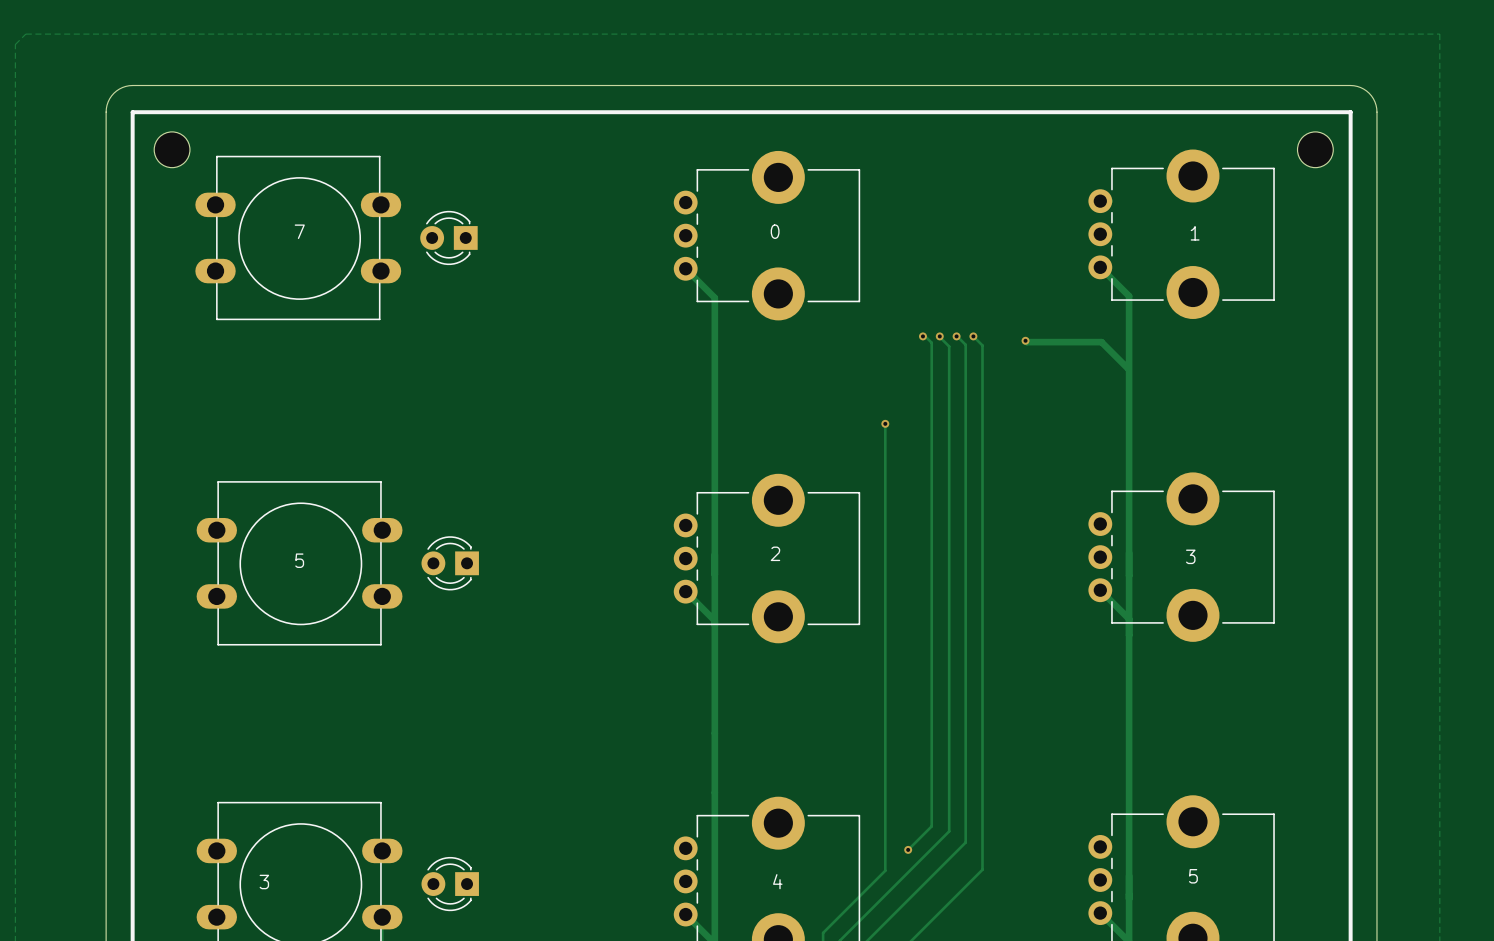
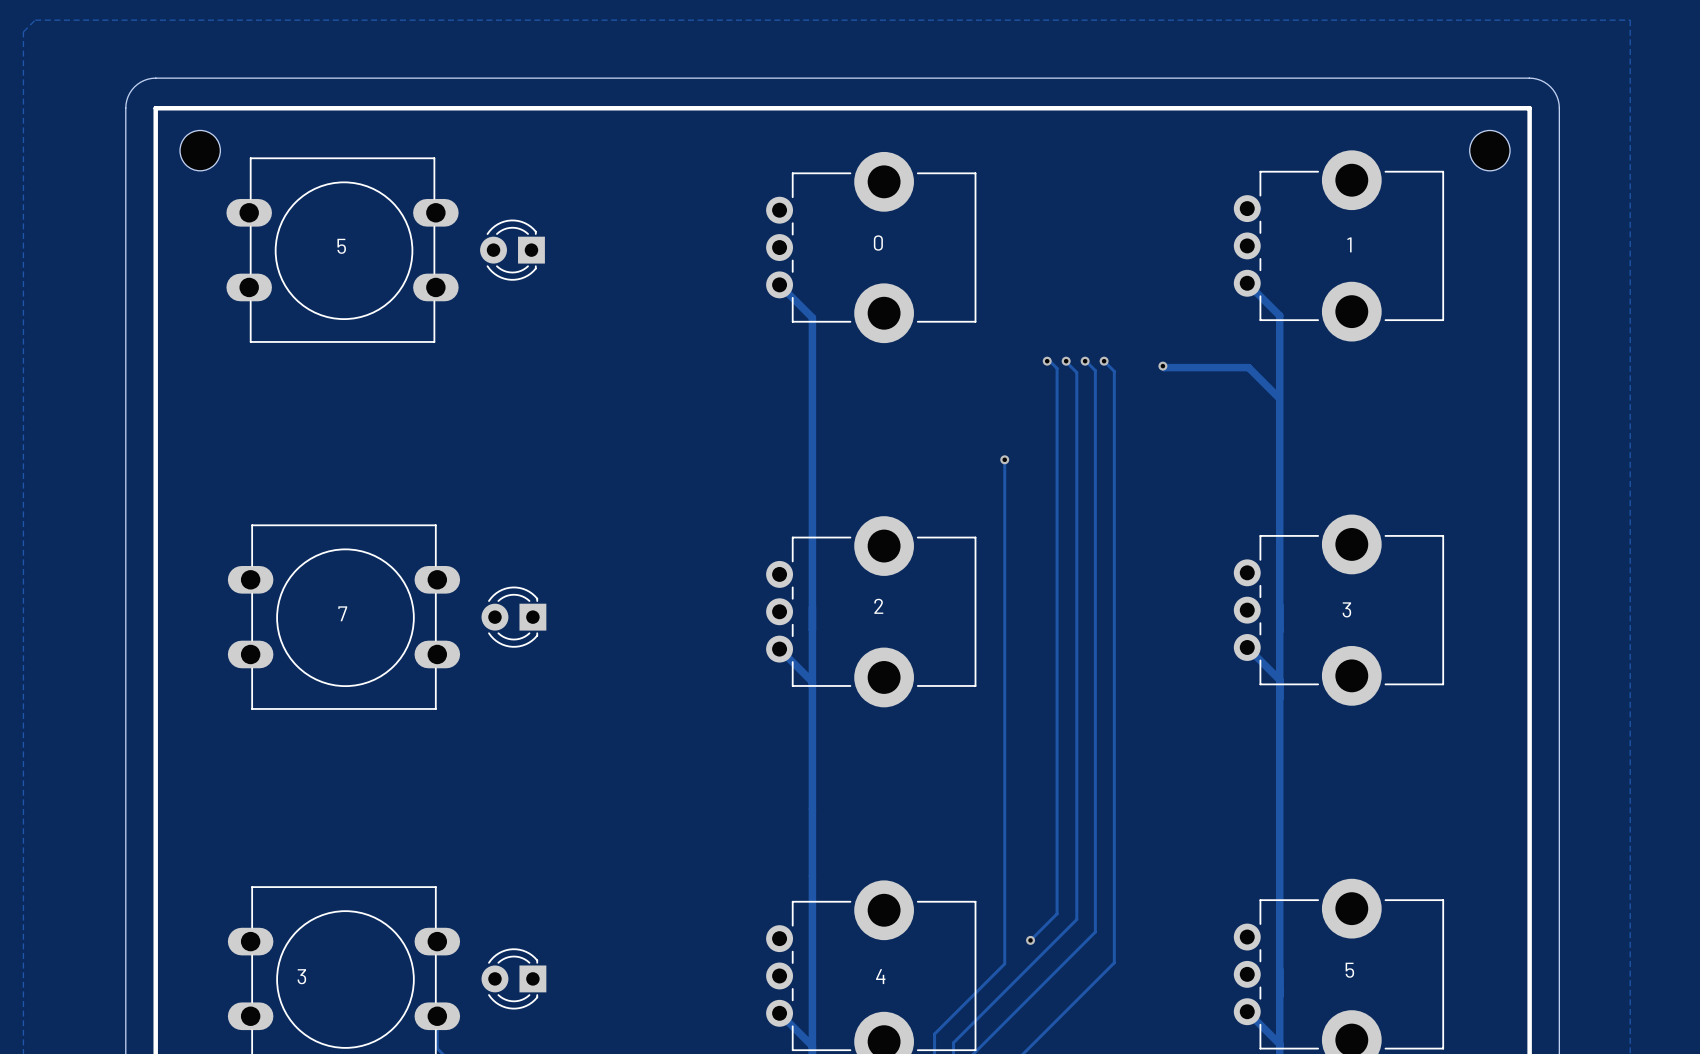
text: 7 (299, 231) -> 5 (341, 246)
text: 5 (299, 560) -> 7 (342, 613)

